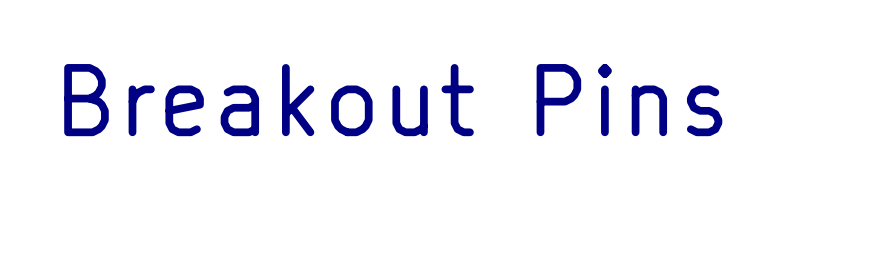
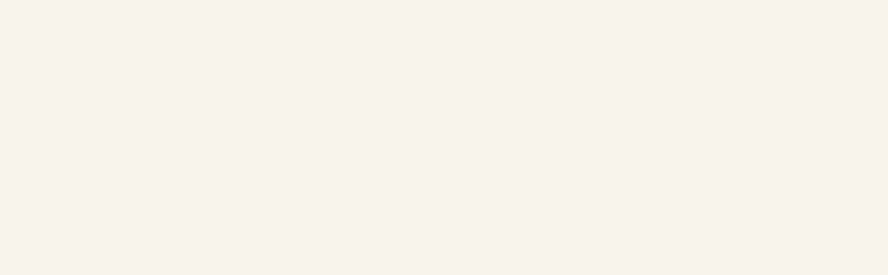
text: Breakout Pins (393, 100) -> none

